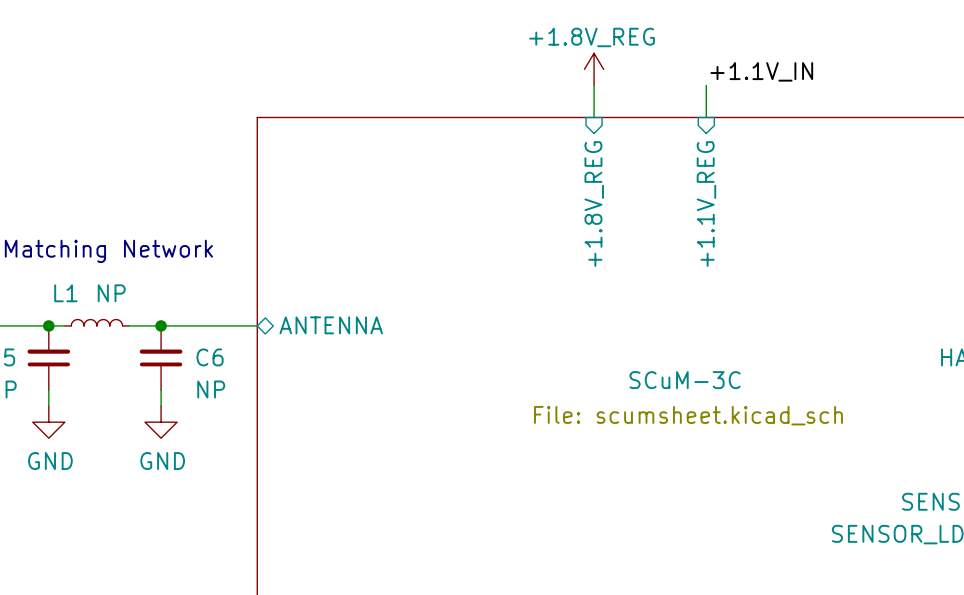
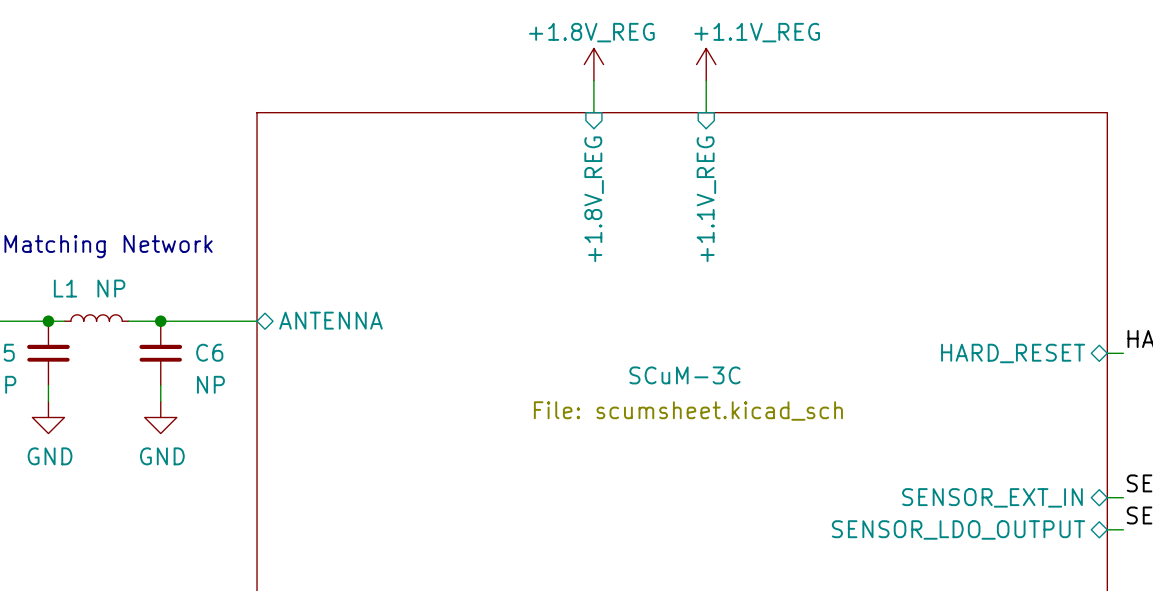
power symbol: none -> +1.1V_REG (706, 64)
label: +1.1V_IN (761, 71) -> none

